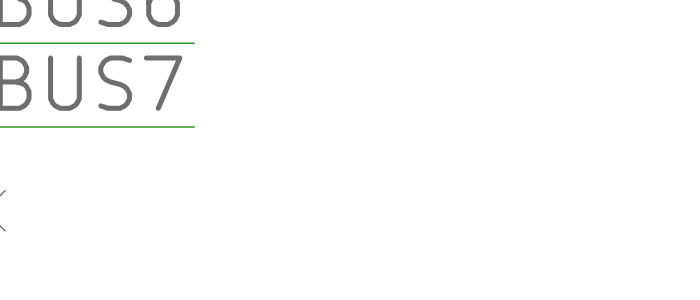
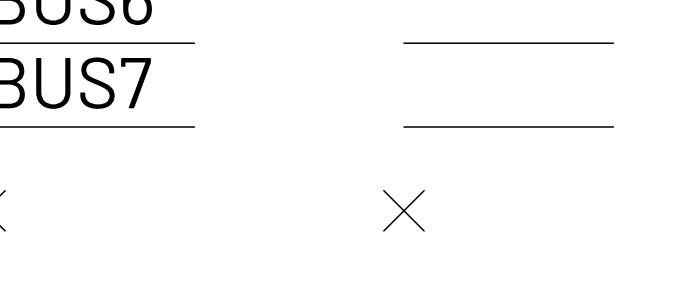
wire: none -> (403, 43) (613, 43)
wire: none -> (403, 127) (613, 127)
no-connect mark: none -> (403, 210)

